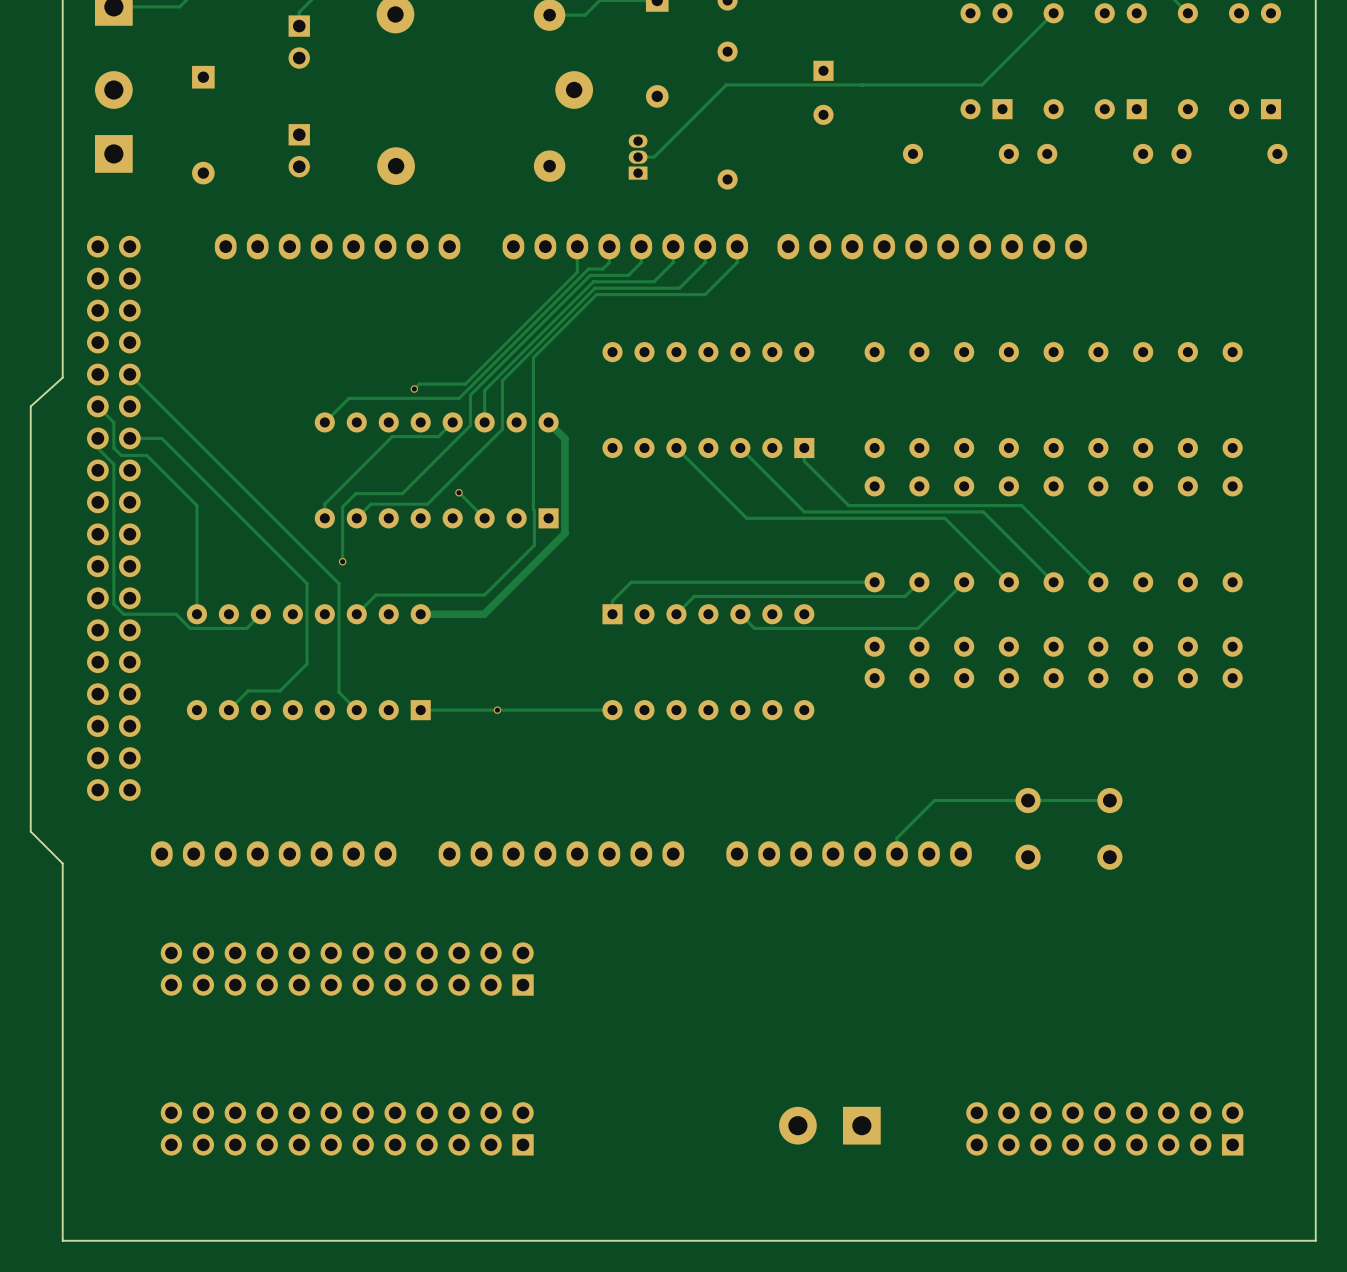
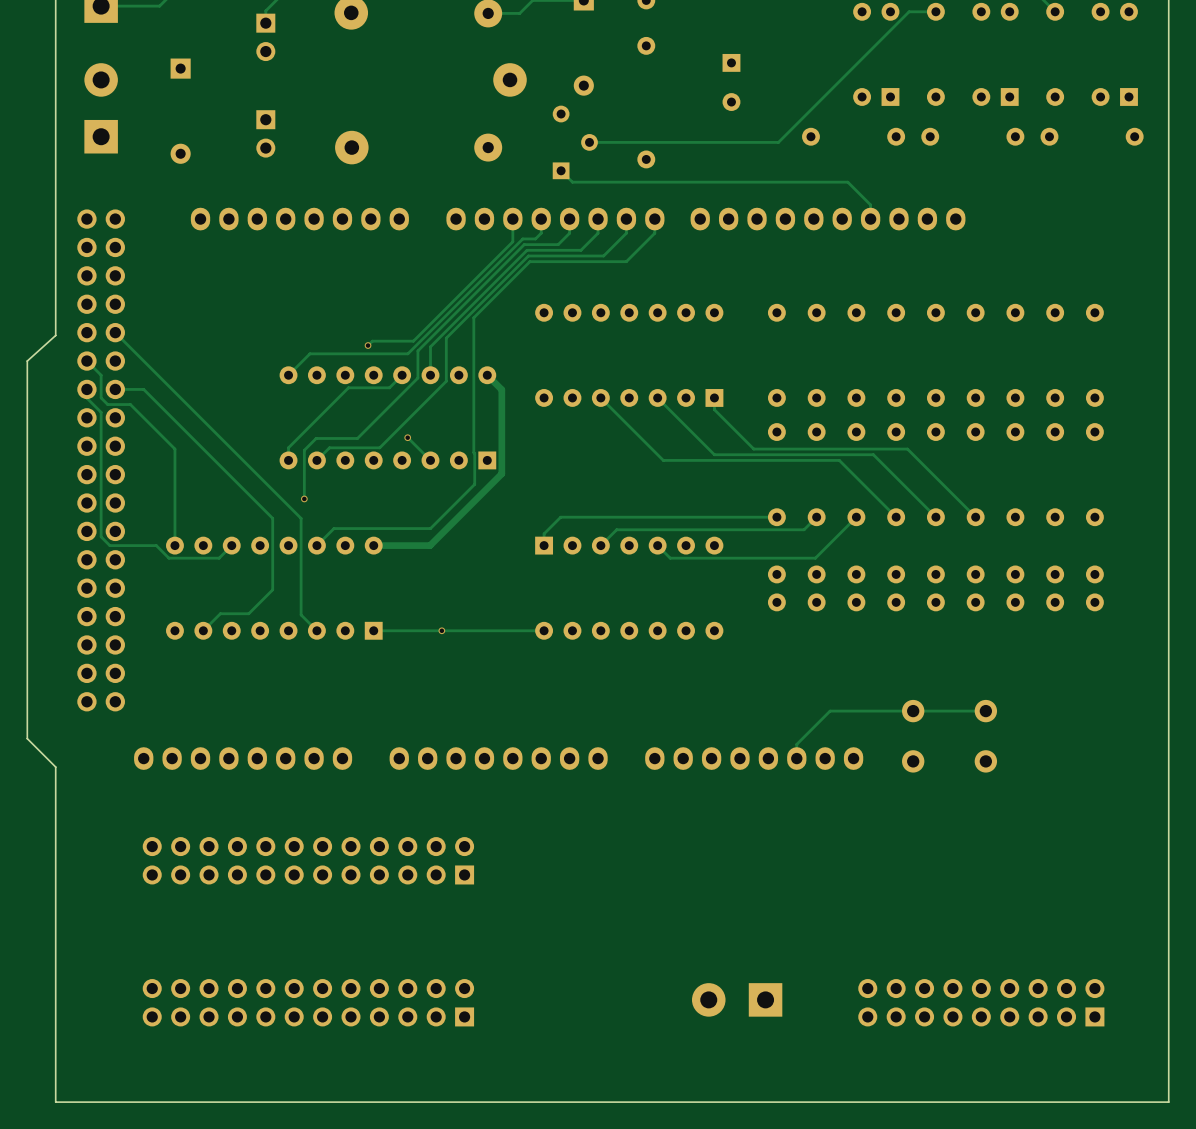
track: (1053, 13) (981, 84) (726, 84) (654, 157) (638, 157) -> (935, 11) (909, 11) (778, 142) (589, 142)
part footprint: [628, 134, 648, 180] -> [552, 105, 598, 180]
track: none -> (561, 170) (572, 182) (847, 182) (870, 204) (870, 219)

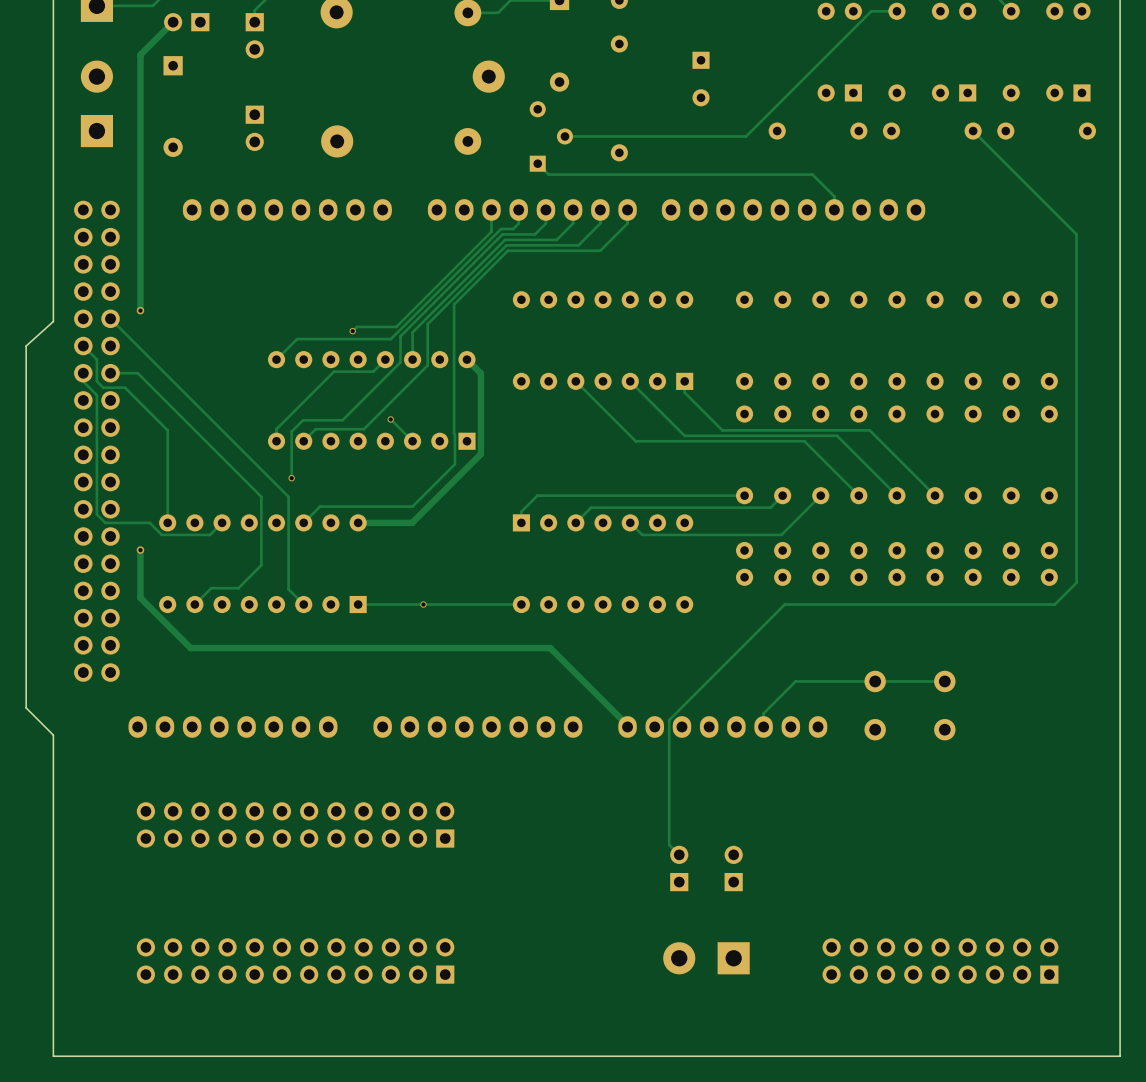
track: none -> (173, 22) (140, 54) (140, 310)
part: none -> (186, 22)
track: none -> (973, 131) (1076, 234) (1076, 582) (1054, 604) (784, 604) (669, 720) (669, 844) (679, 854)
via: none -> (140, 310)
track: none -> (140, 550) (140, 597) (190, 648) (550, 648) (627, 726)
via: none -> (140, 550)
part: none -> (679, 868)
part: none -> (733, 868)

